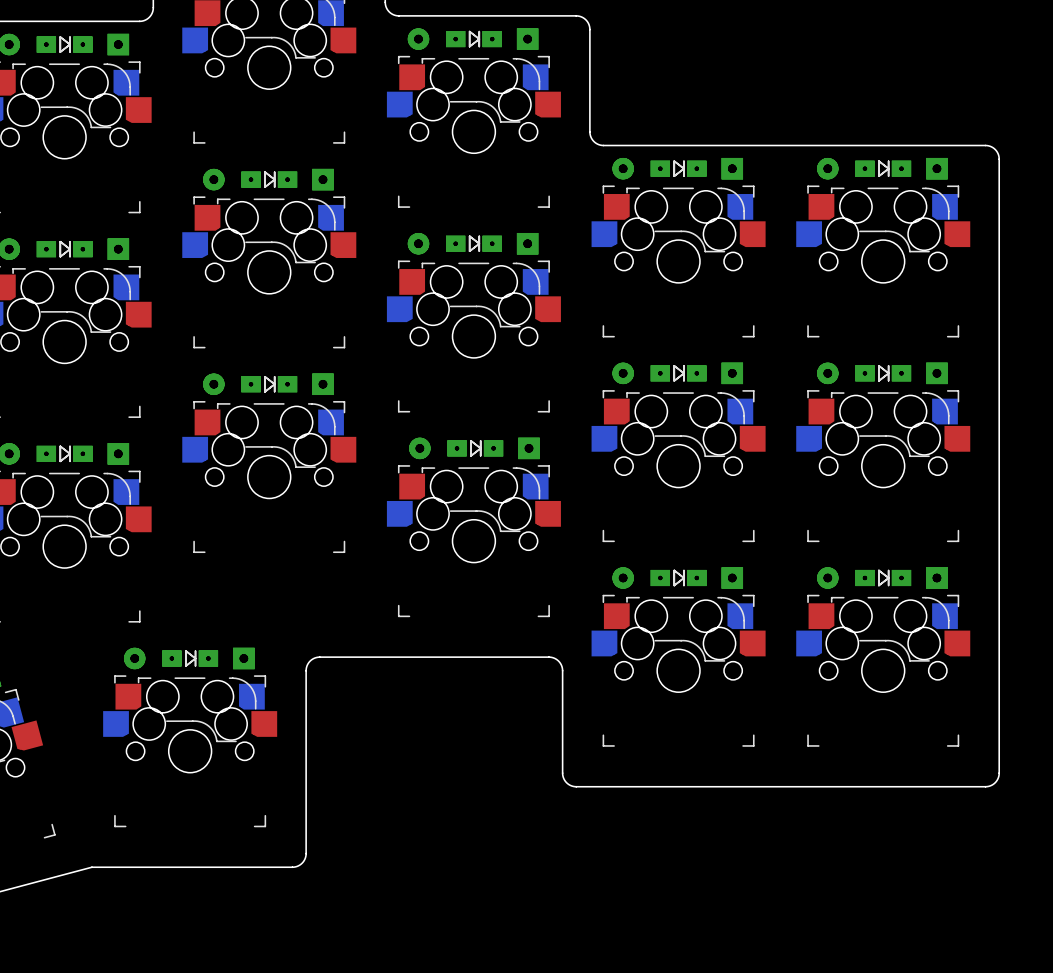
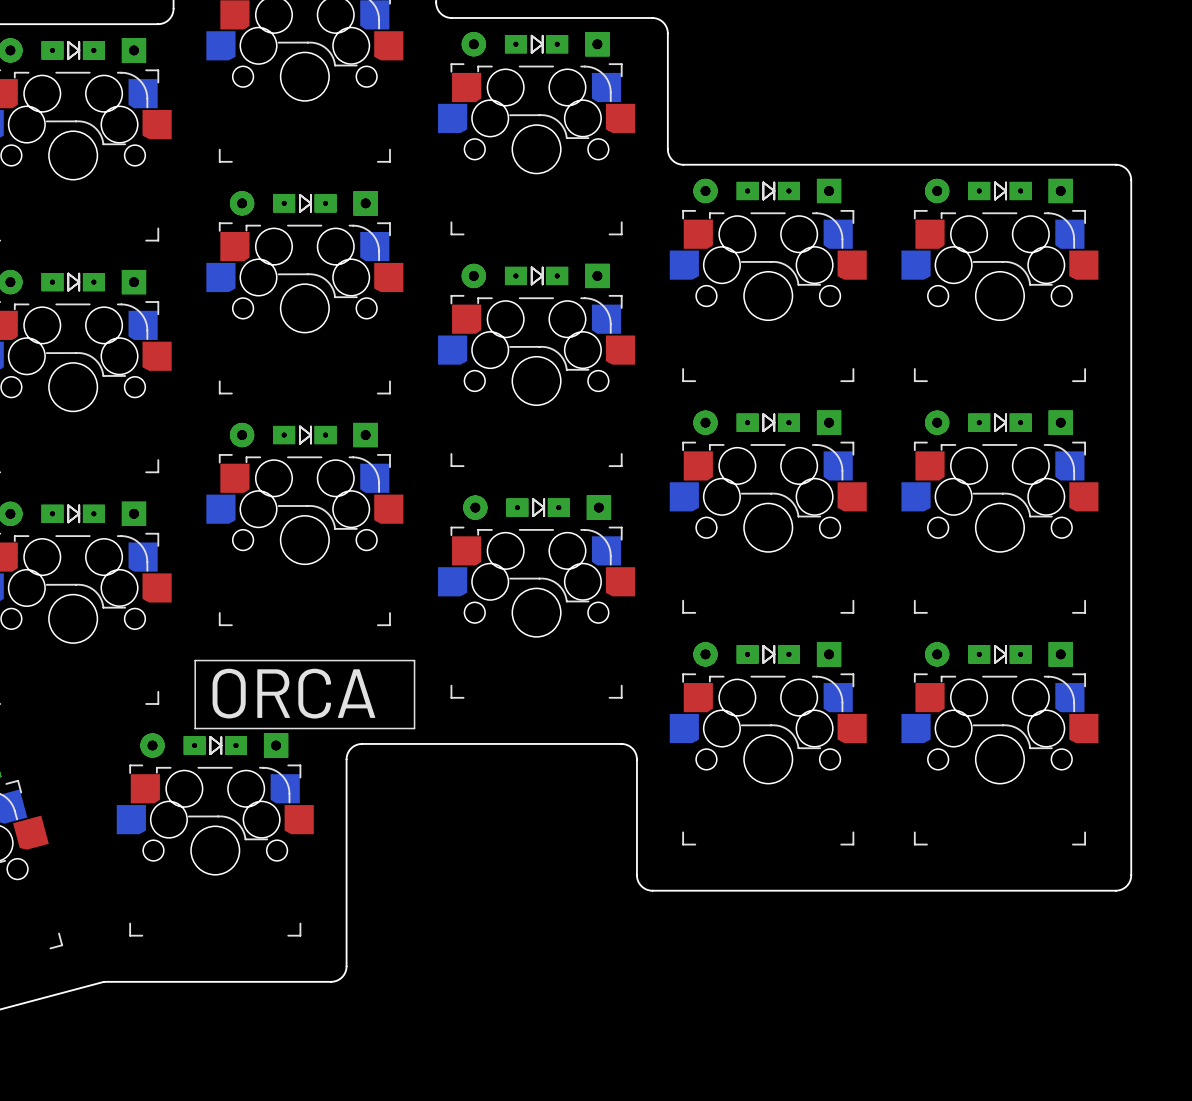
line: none -> (195, 660) (414, 660) (414, 728) (195, 728) (195, 660)
text: none -> ORCA (293, 693)

